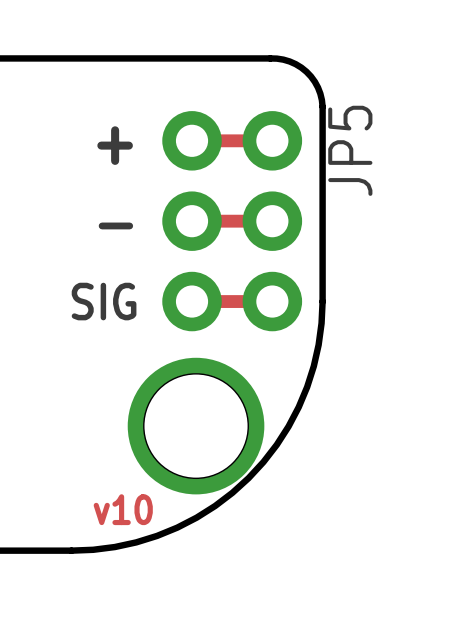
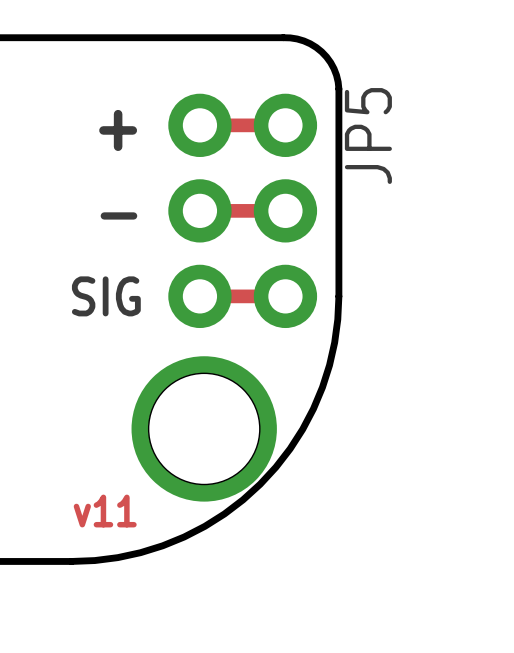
text: v10 (123, 509) -> v11 (105, 511)

